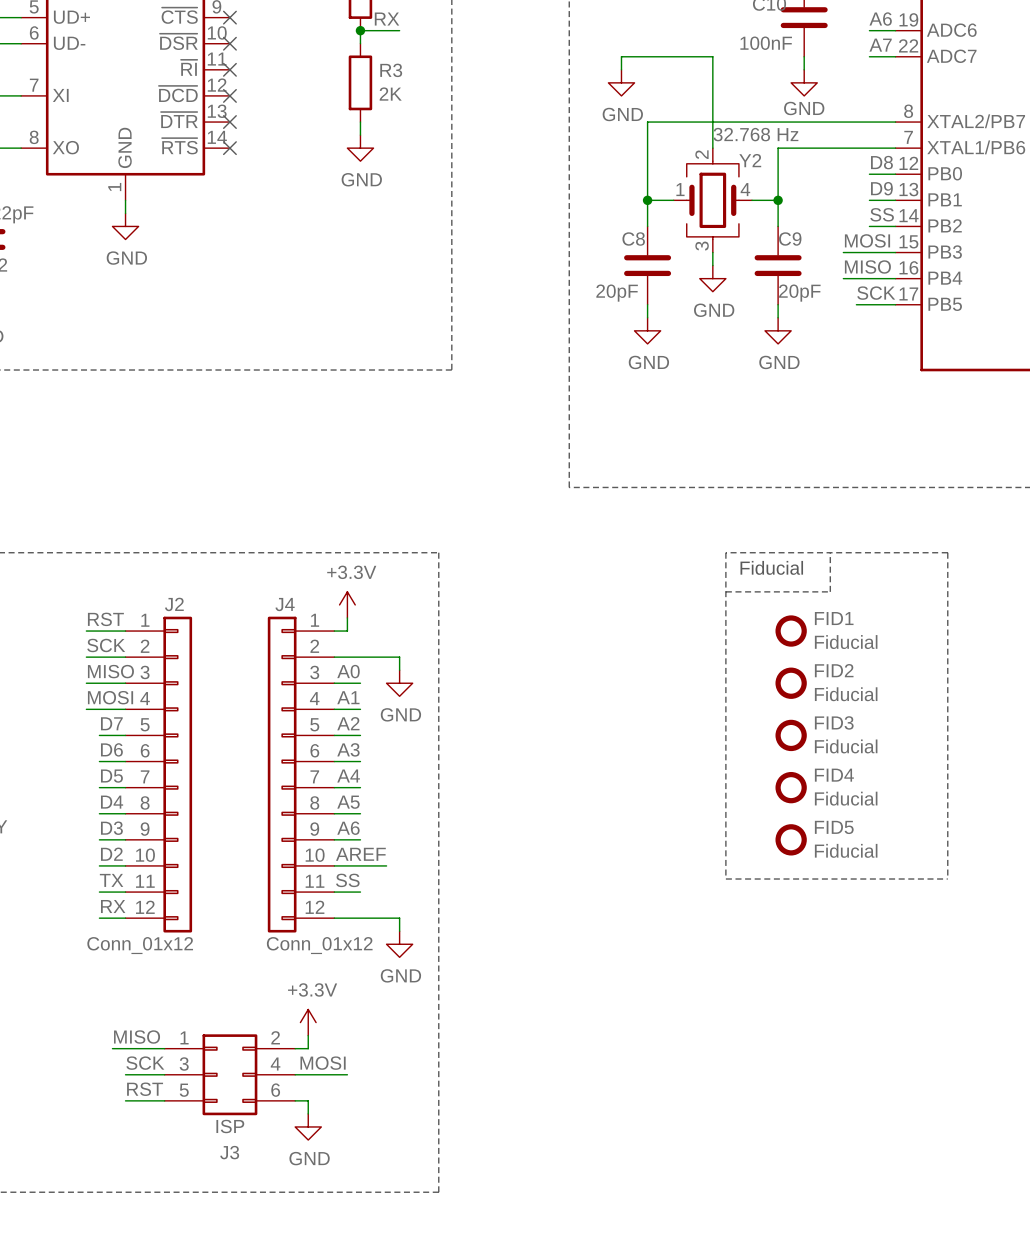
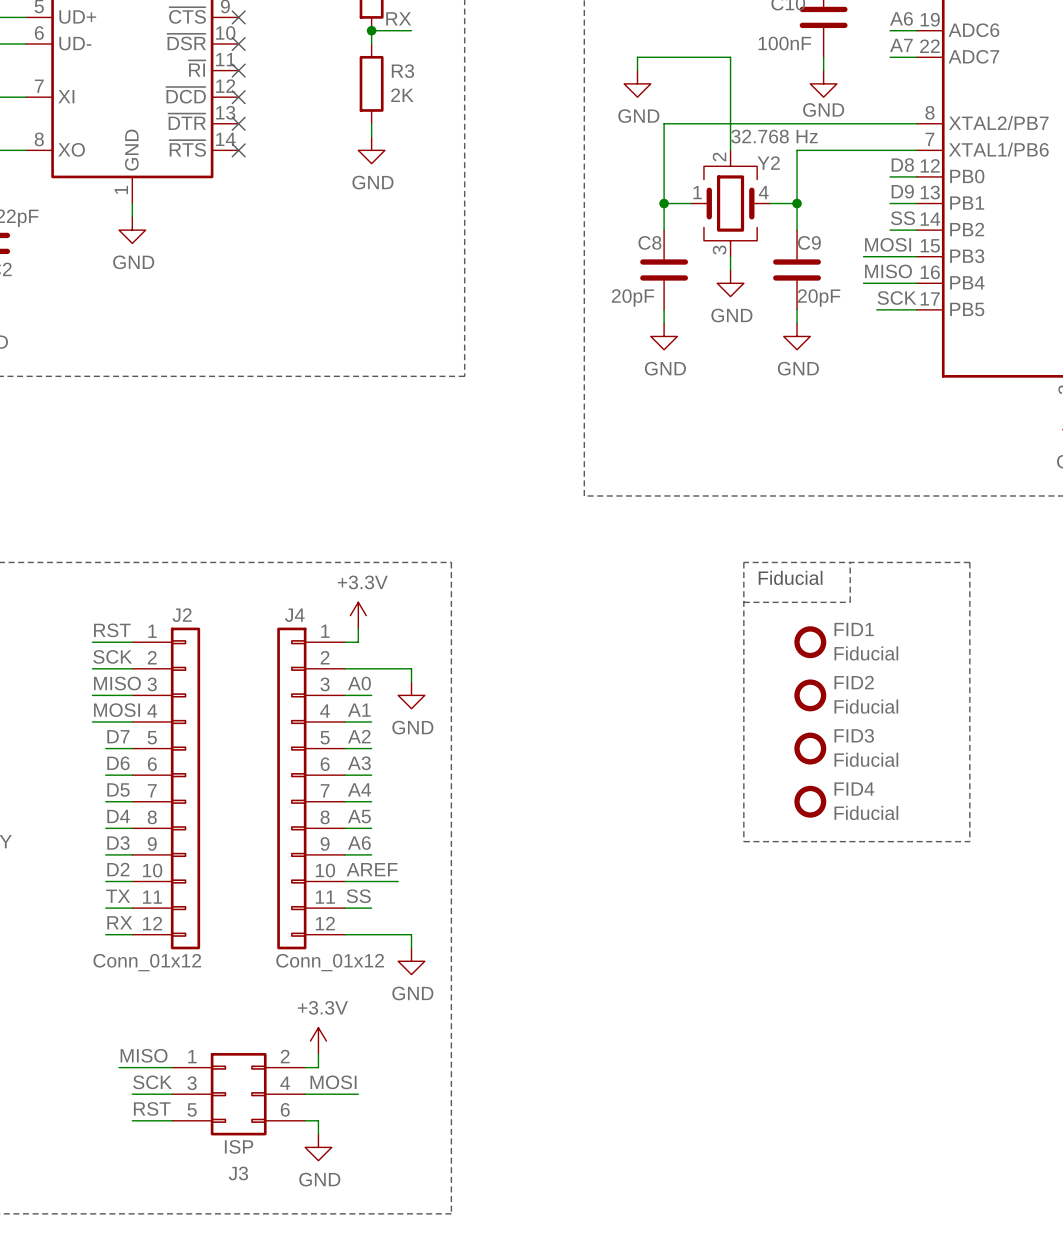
line: (725, 826) (725, 879) (947, 879) (947, 826) -> (743, 841) (969, 841)
FID5: Fiducial (791, 839) -> none

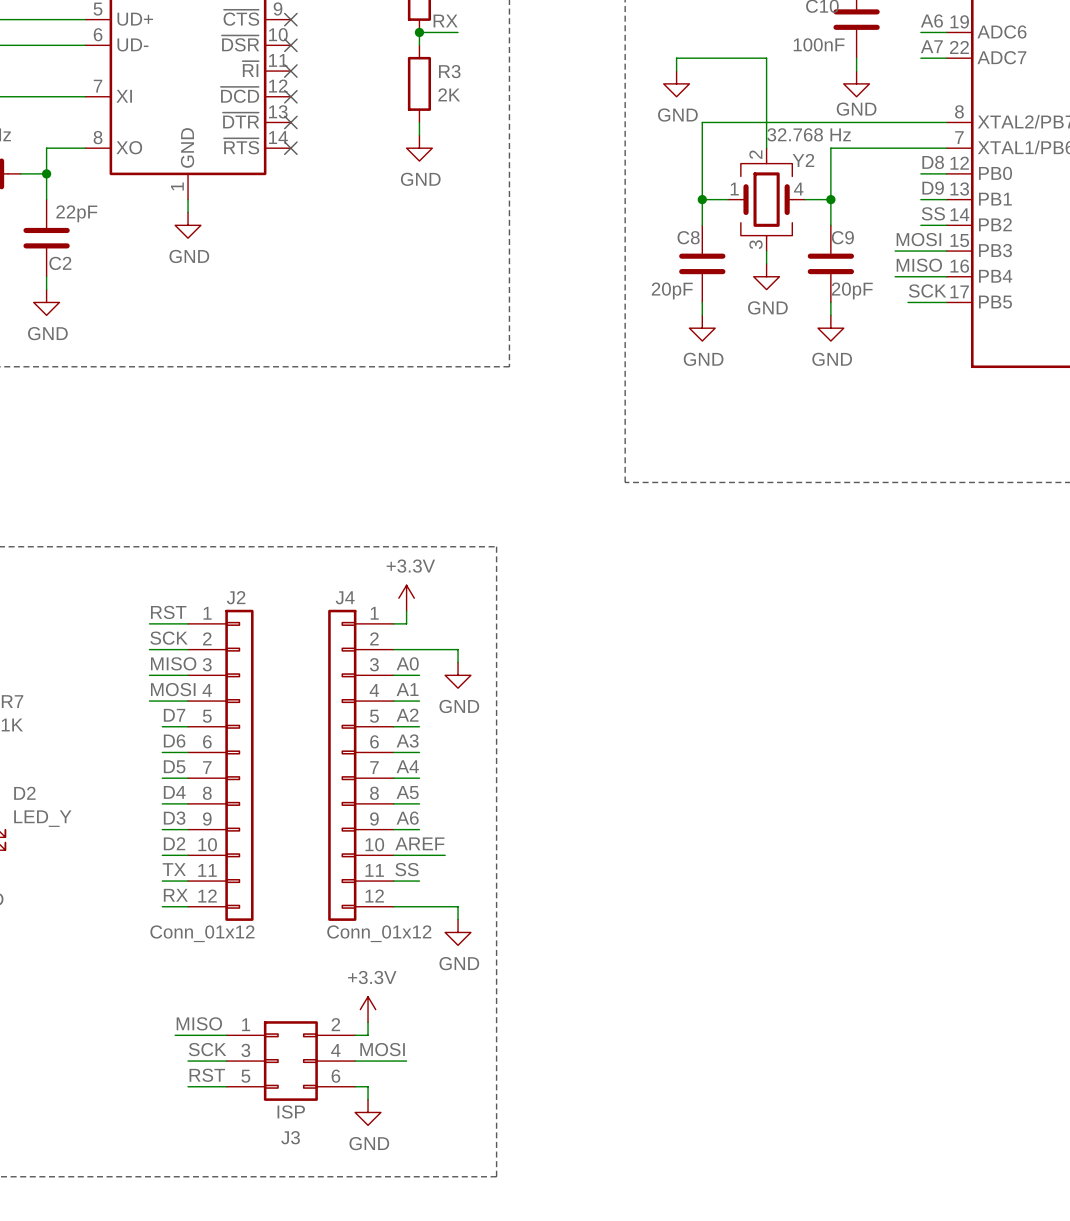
line: (743, 562) (969, 562) (969, 841) (743, 841) (743, 562) -> none
line: (850, 562) (850, 602) (743, 602) -> none
text: Fiducial (790, 577) -> none
FID1: Fiducial (810, 642) -> none
FID2: Fiducial (810, 695) -> none
FID3: Fiducial (810, 748) -> none
FID4: Fiducial (810, 801) -> none

